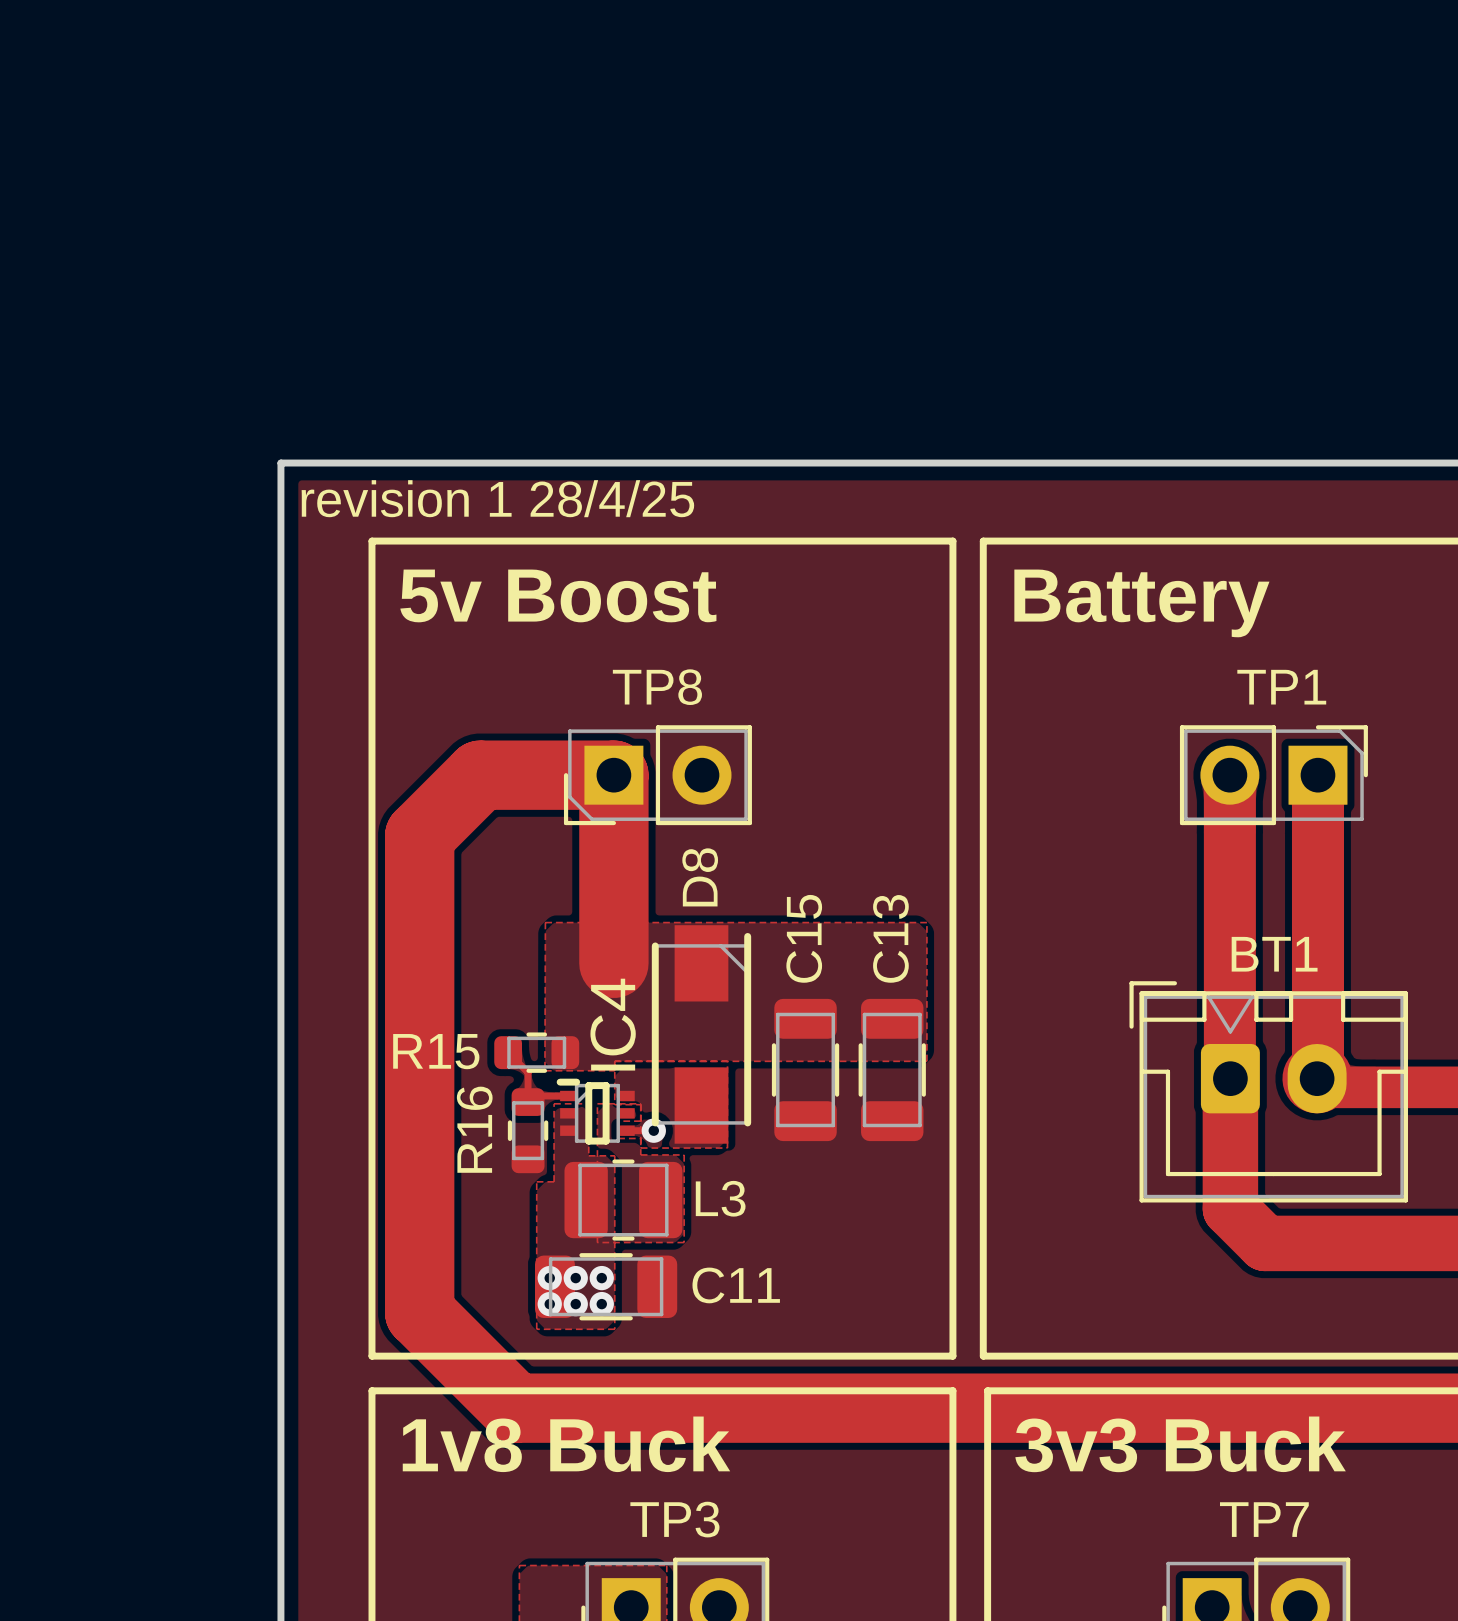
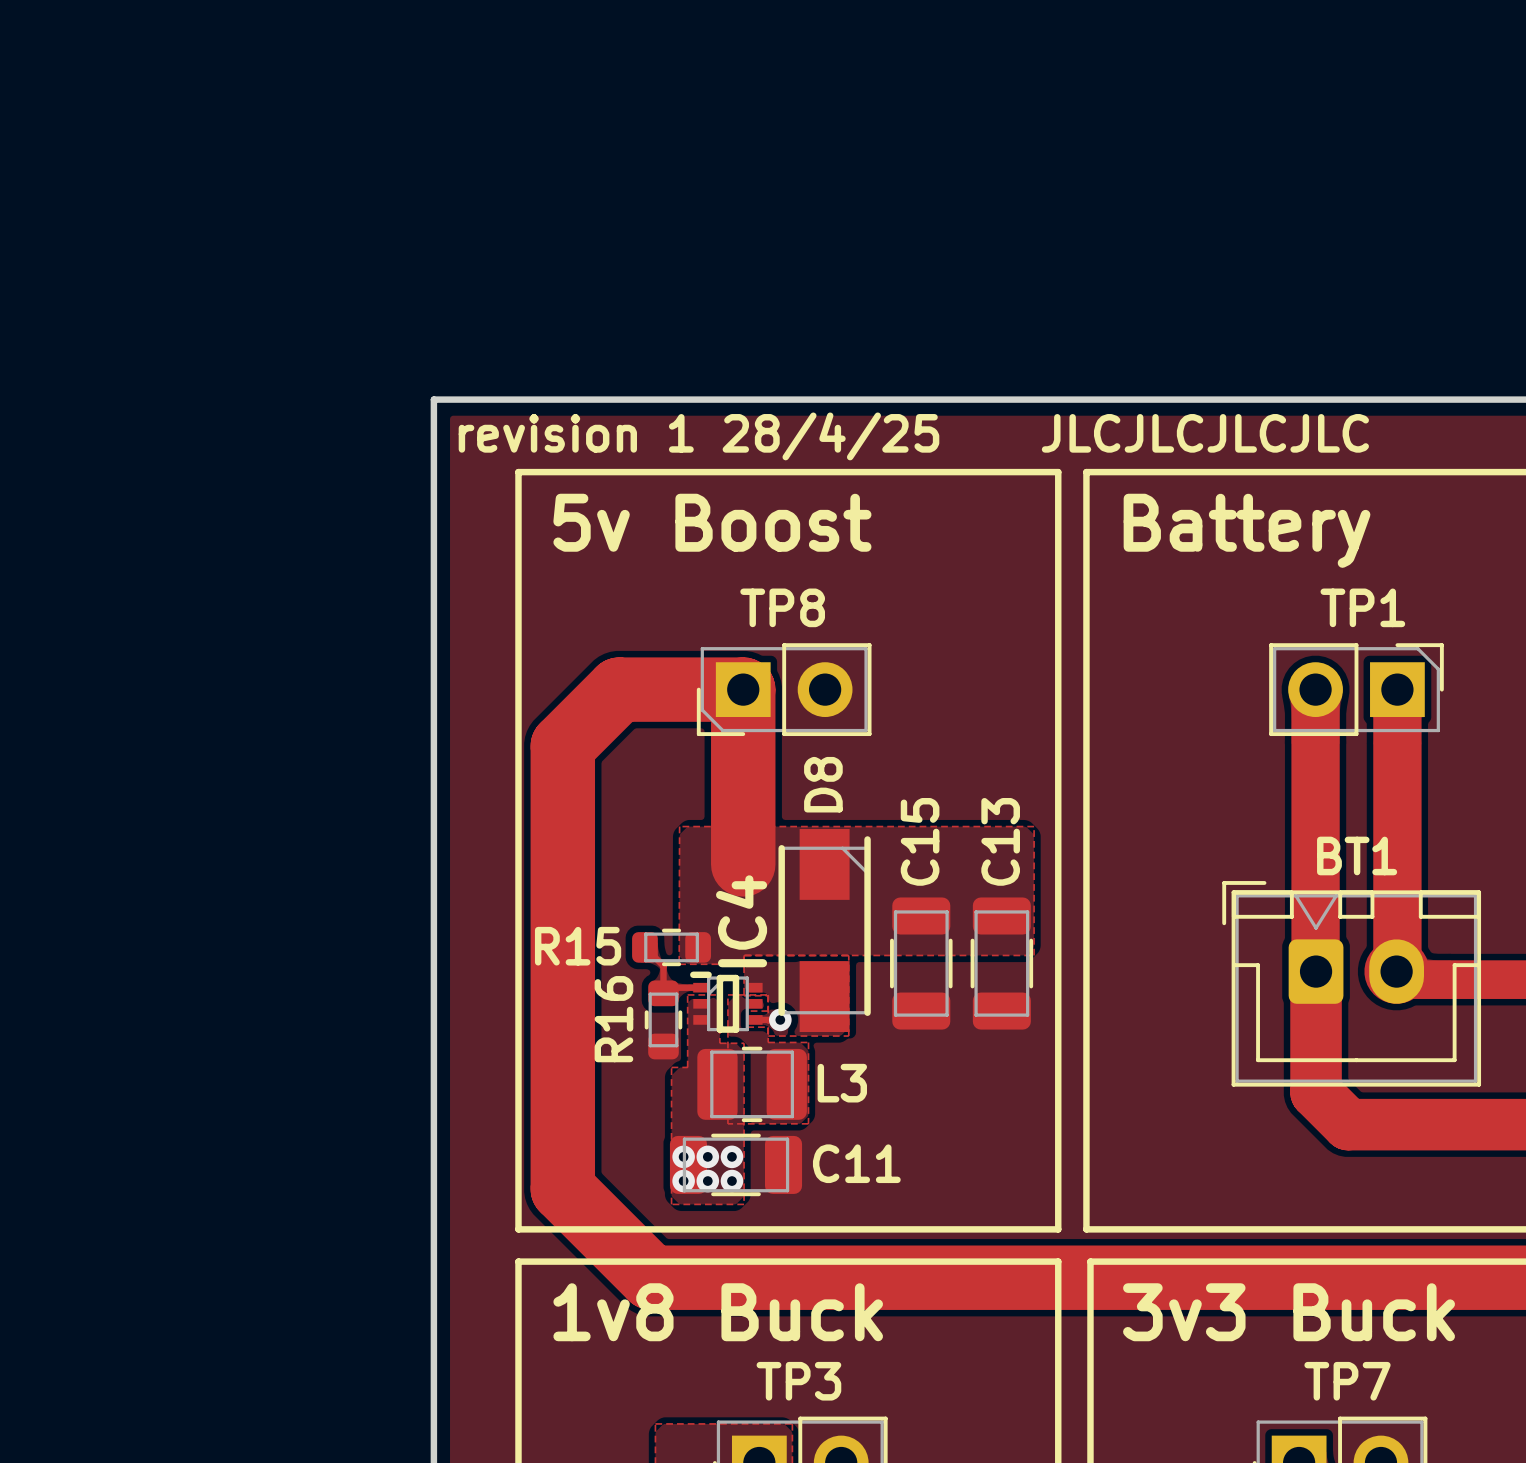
text: revision 1 28/4/25 (497, 498) -> revision 1 28/4/25 JLCJLCJLCJLC (913, 436)

